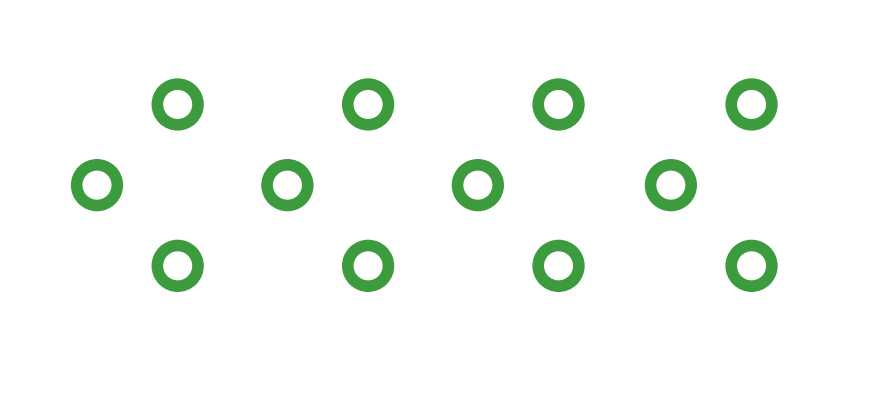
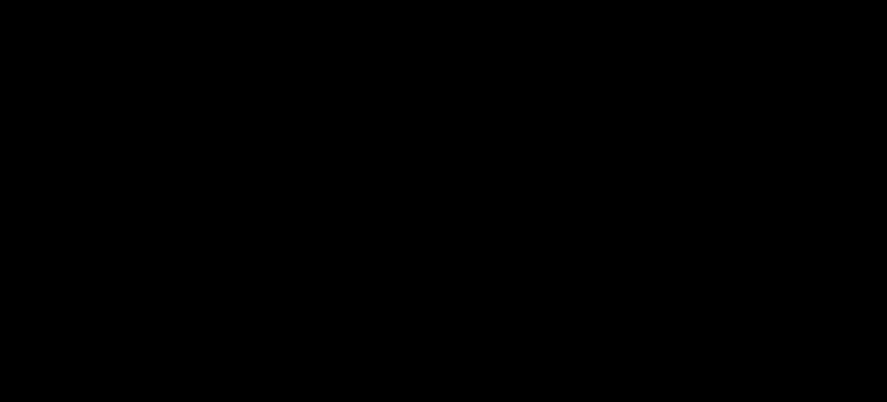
part: (137, 185) -> none
part: (327, 185) -> none
part: (518, 185) -> none
part: (711, 185) -> none

